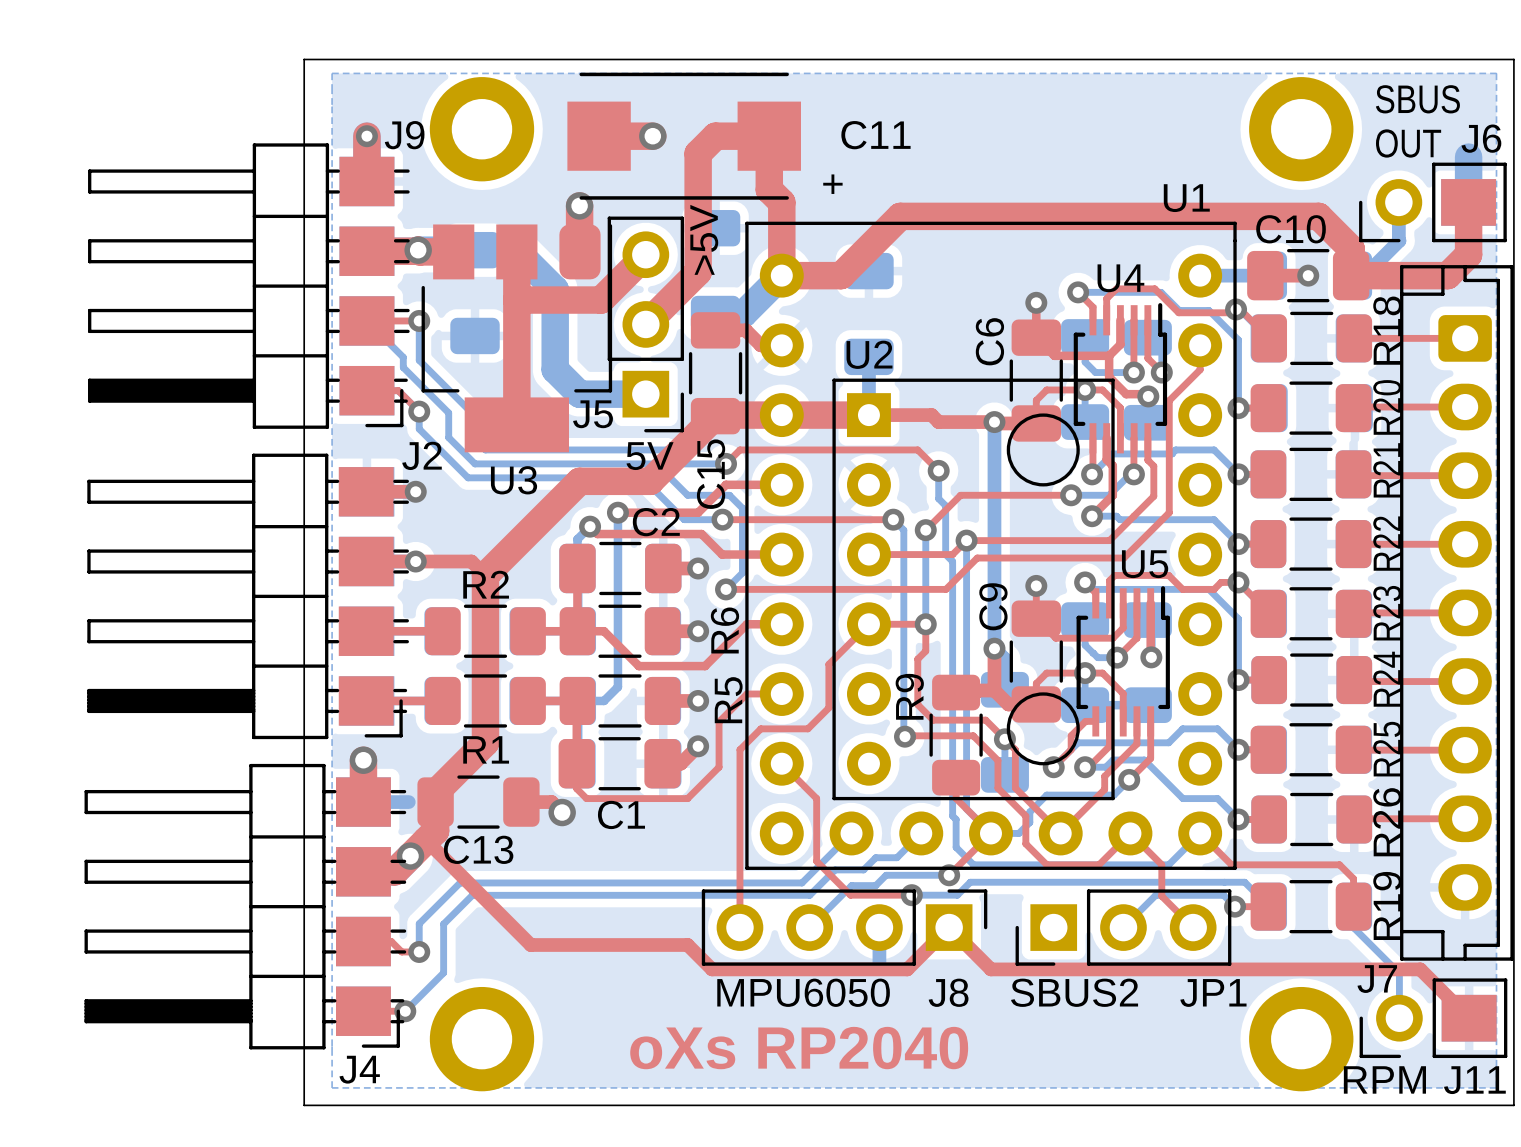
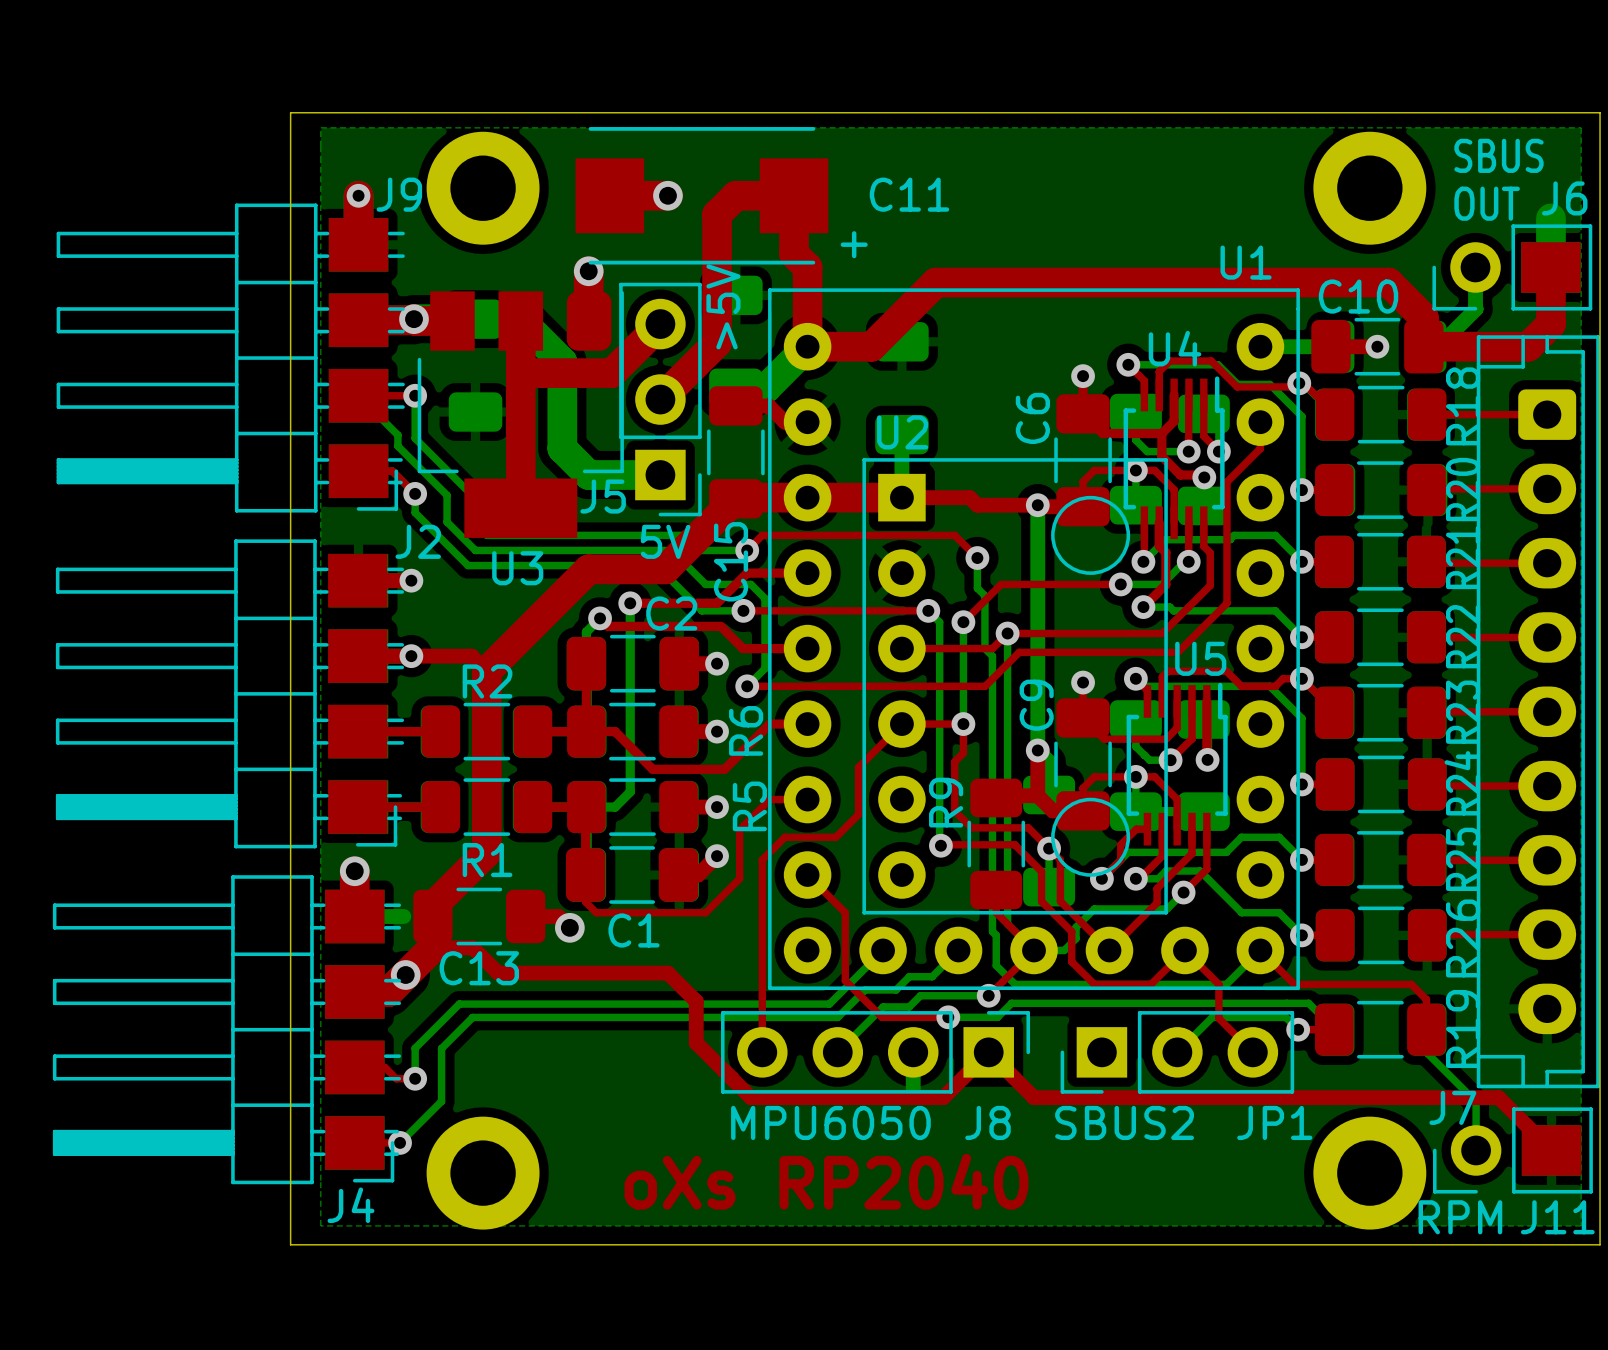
top track: (426, 840) (530, 945) (687, 945) (712, 969) (729, 969) -> (432, 947) (472, 947) (498, 973) (667, 973) (696, 1001) (696, 1042) (750, 1097)

